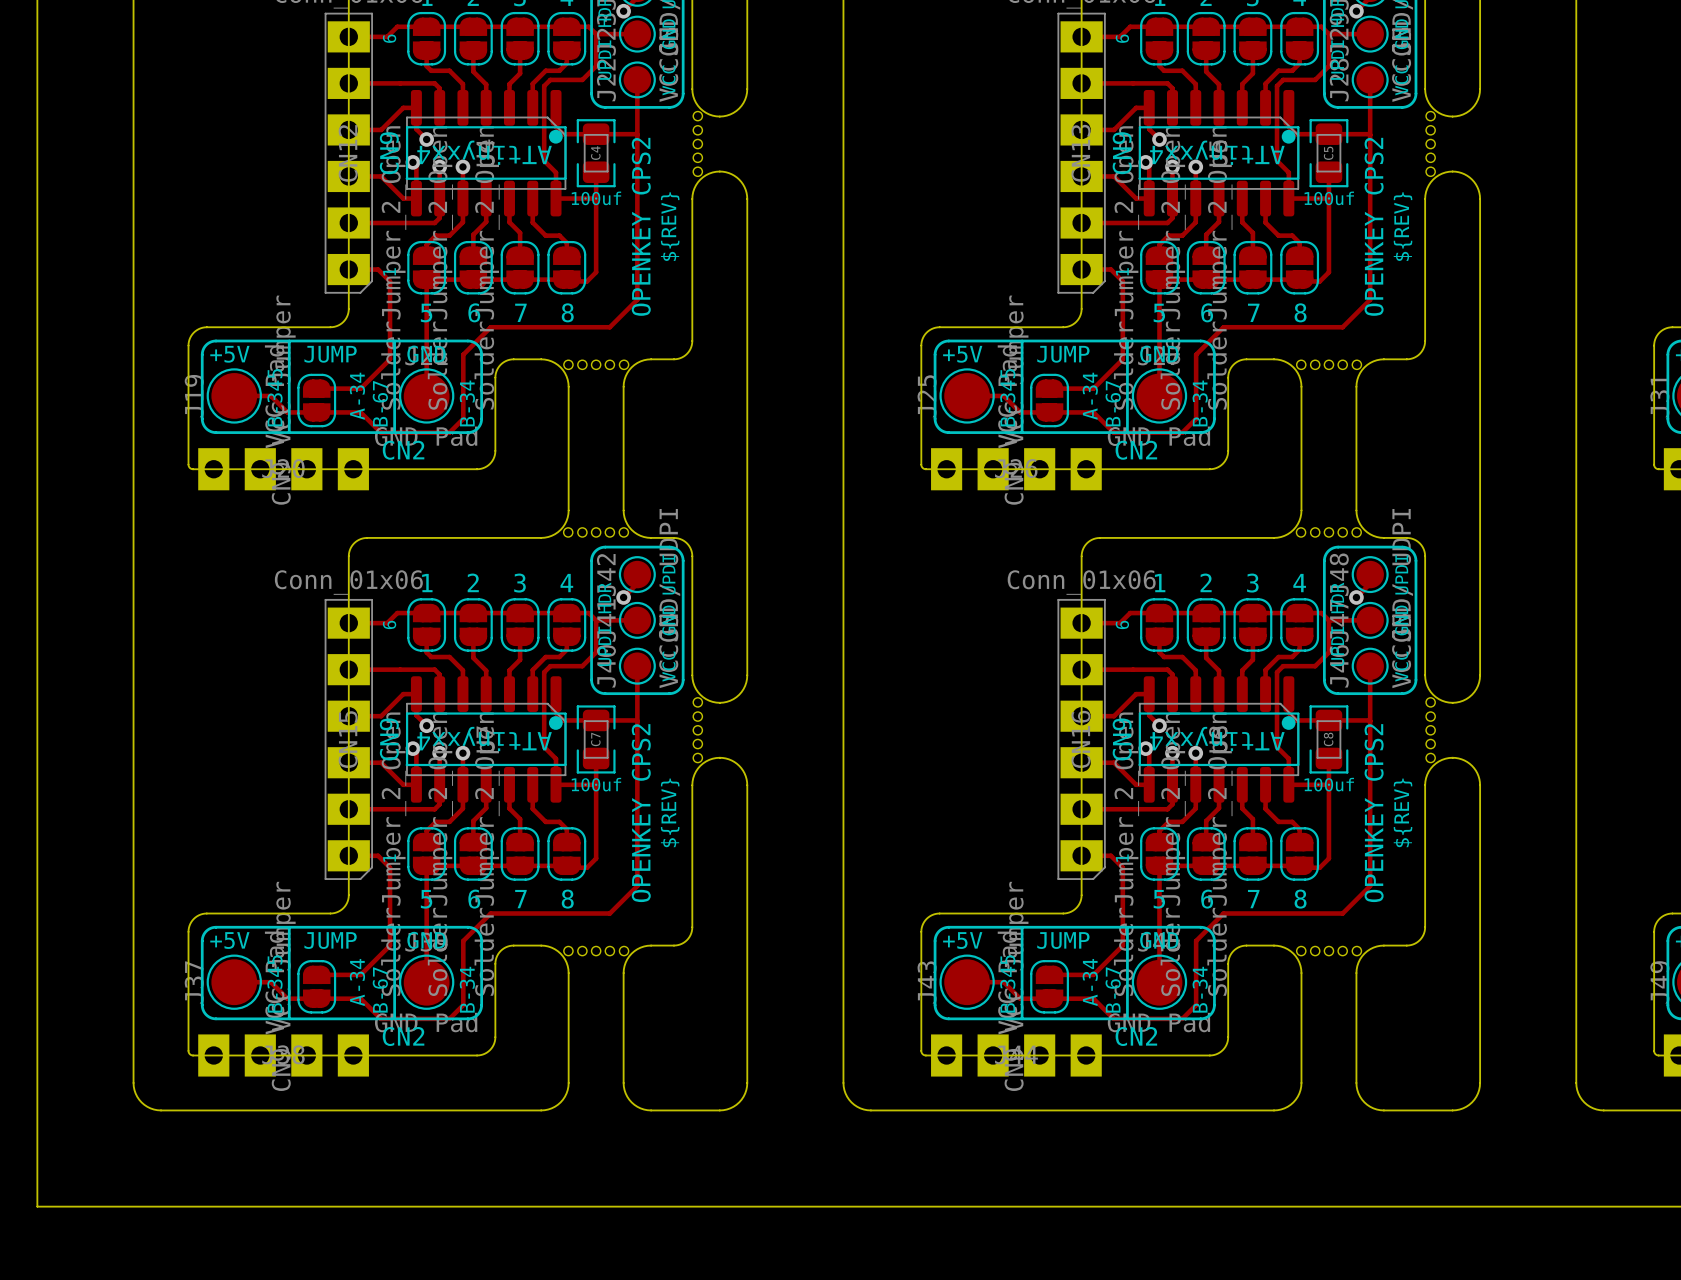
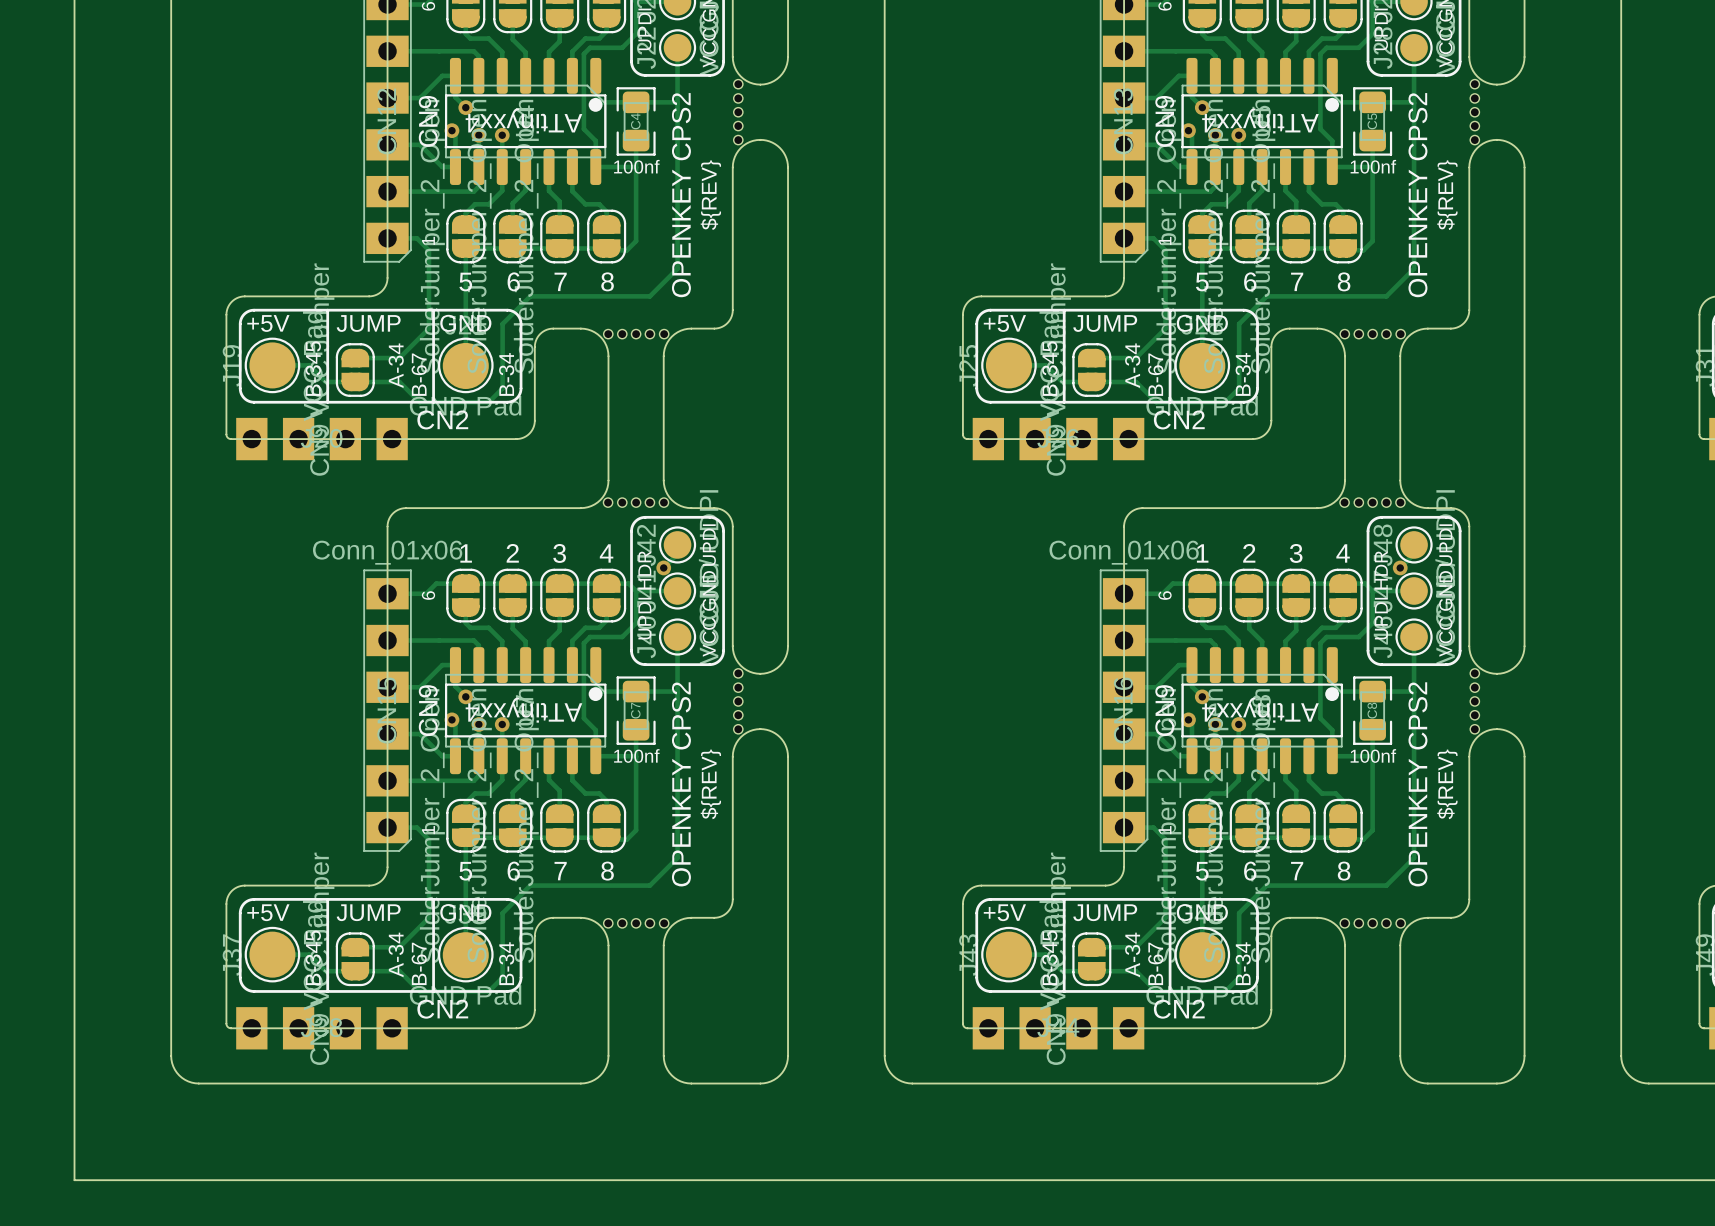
C4 value: 100uf (596, 198) -> 100nf (636, 166)
C5 value: 100uf (1329, 198) -> 100nf (1373, 166)
C7 value: 100uf (596, 784) -> 100nf (636, 755)
C8 value: 100uf (1329, 784) -> 100nf (1373, 755)

